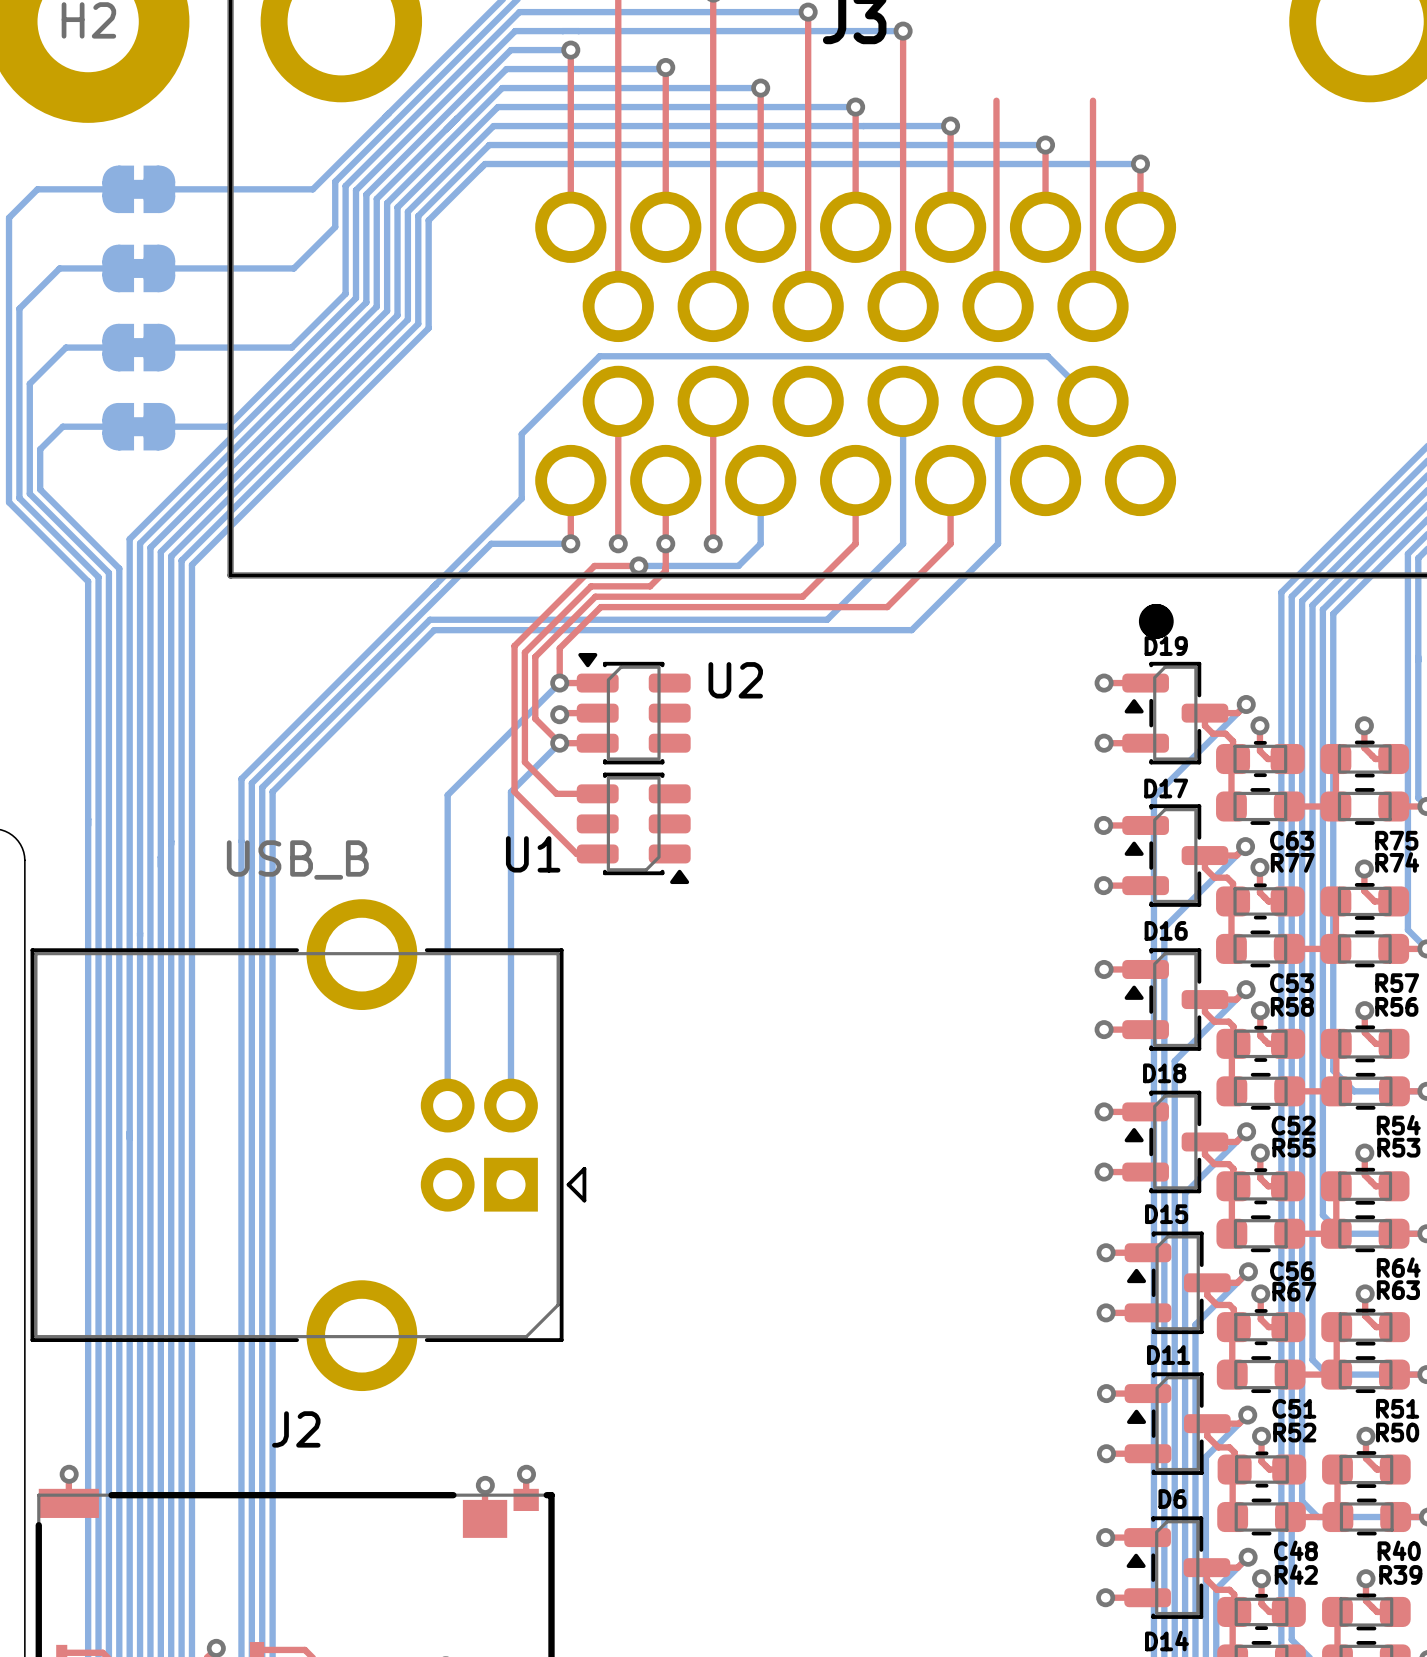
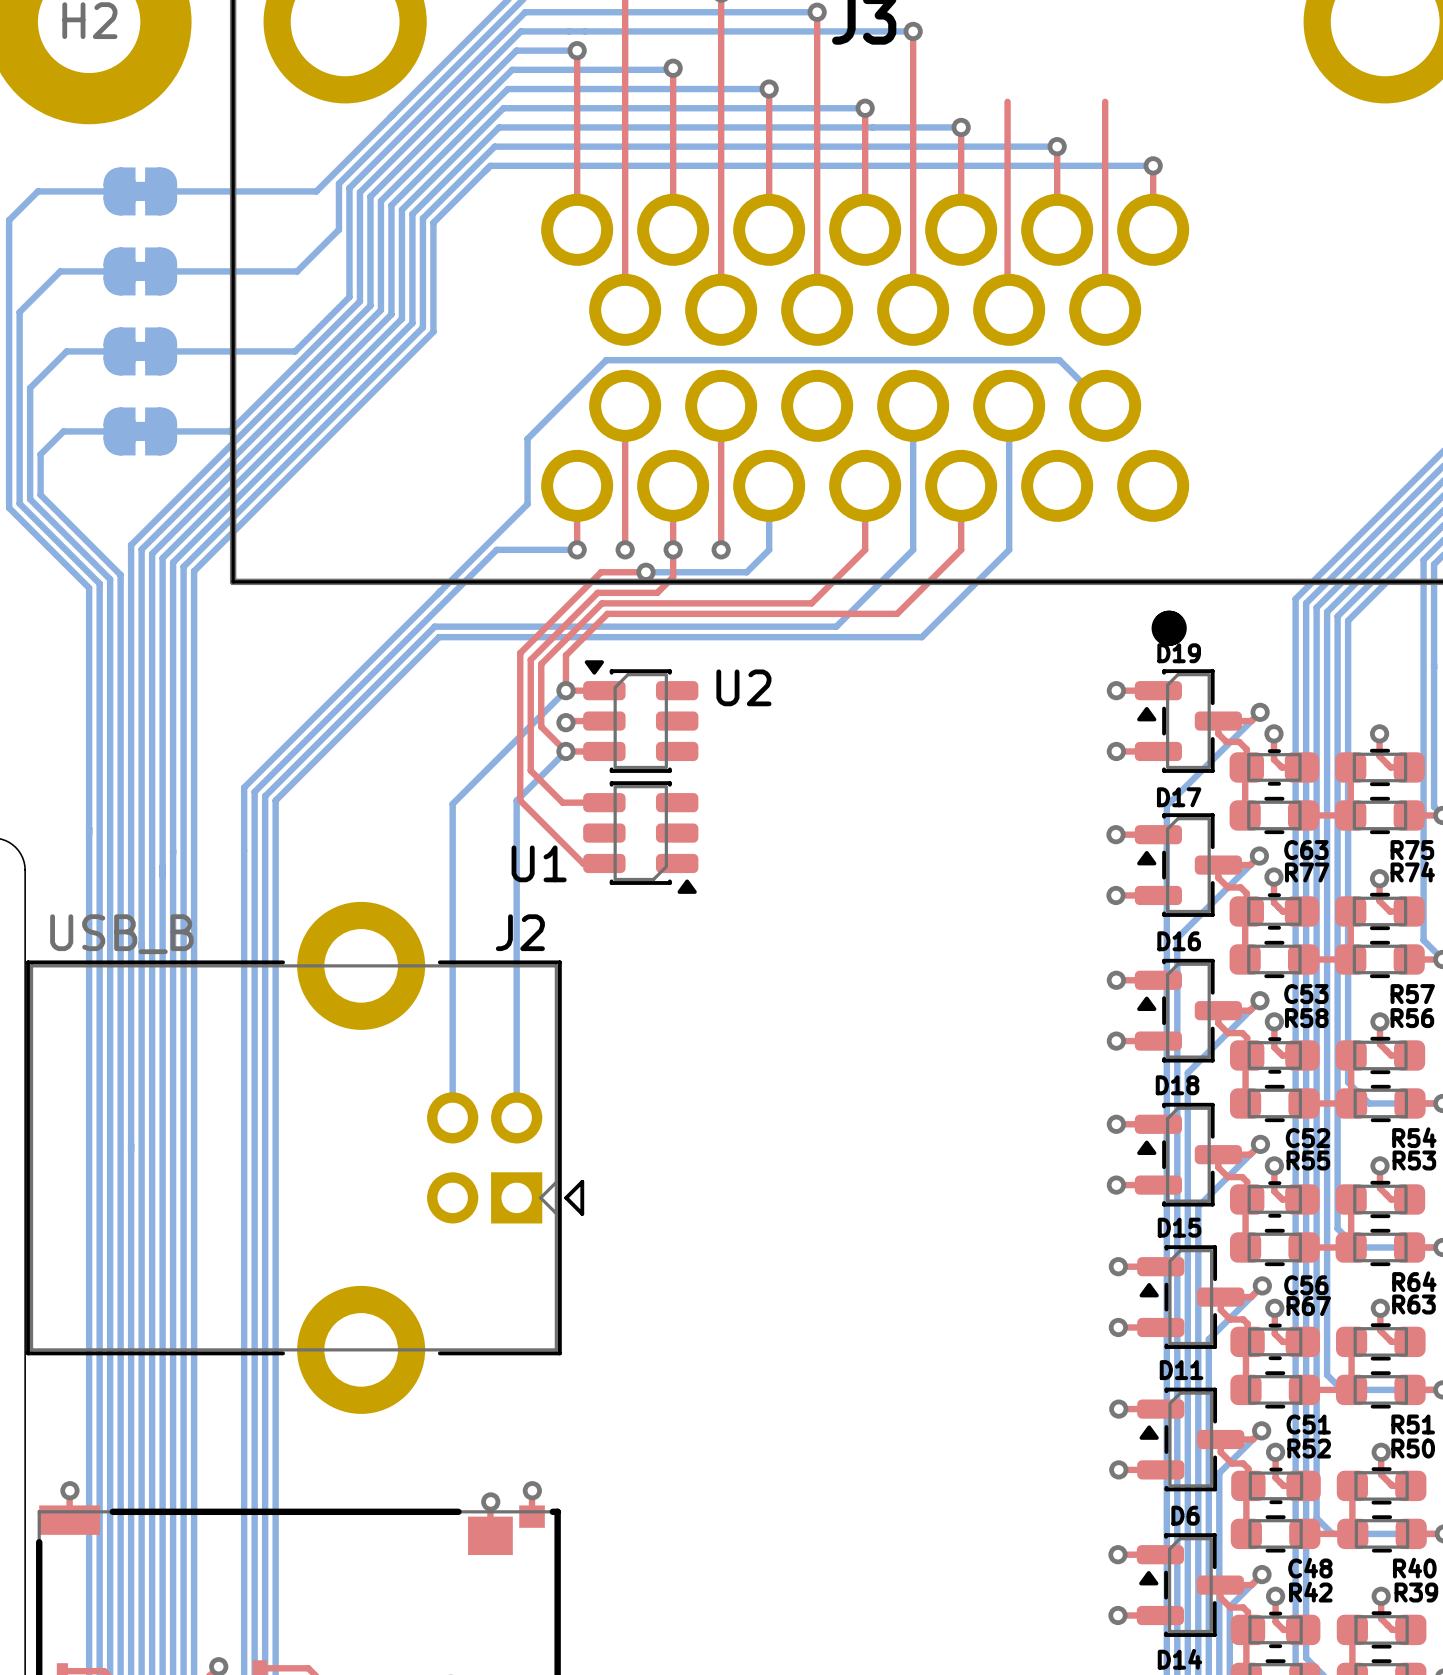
J2 value position: USB_B (297, 859) -> USB_B (121, 934)
J2 footprint: [30, 899, 587, 1392] -> [26, 901, 585, 1414]
J2 name position: J2 (296, 1429) -> J2 (520, 932)

